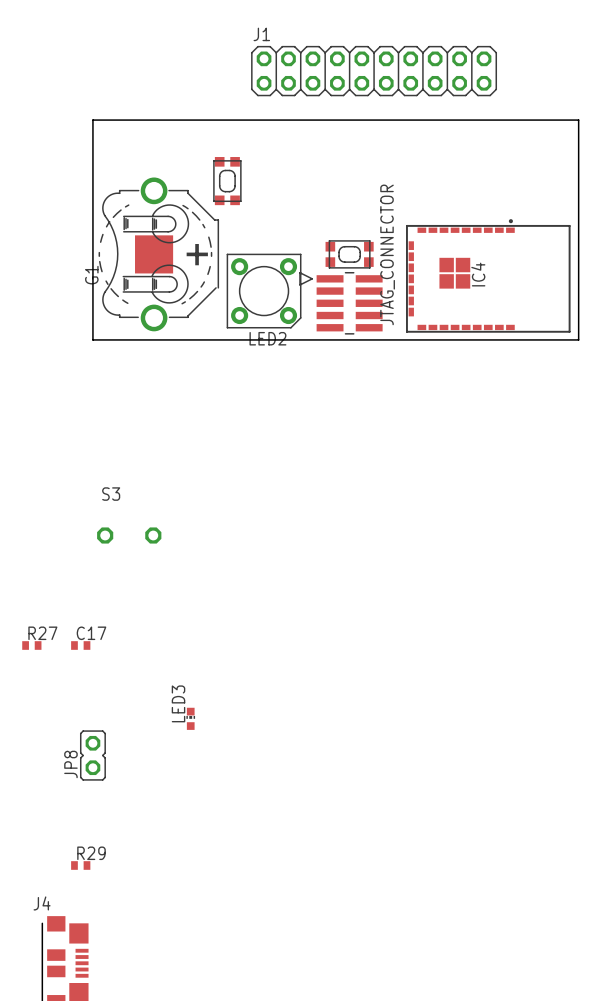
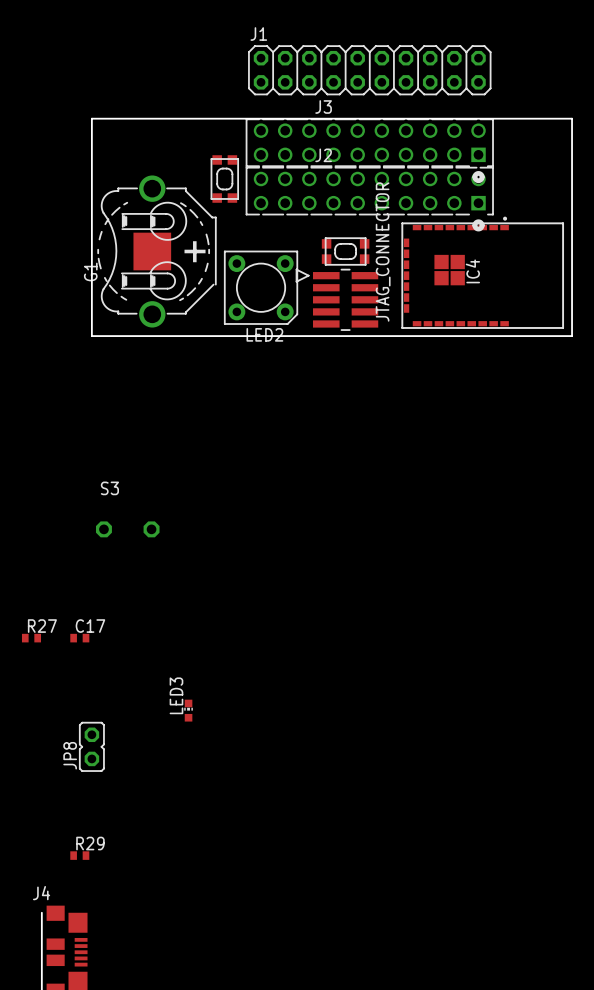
J3: none -> (369, 150)
J2: none -> (369, 199)

